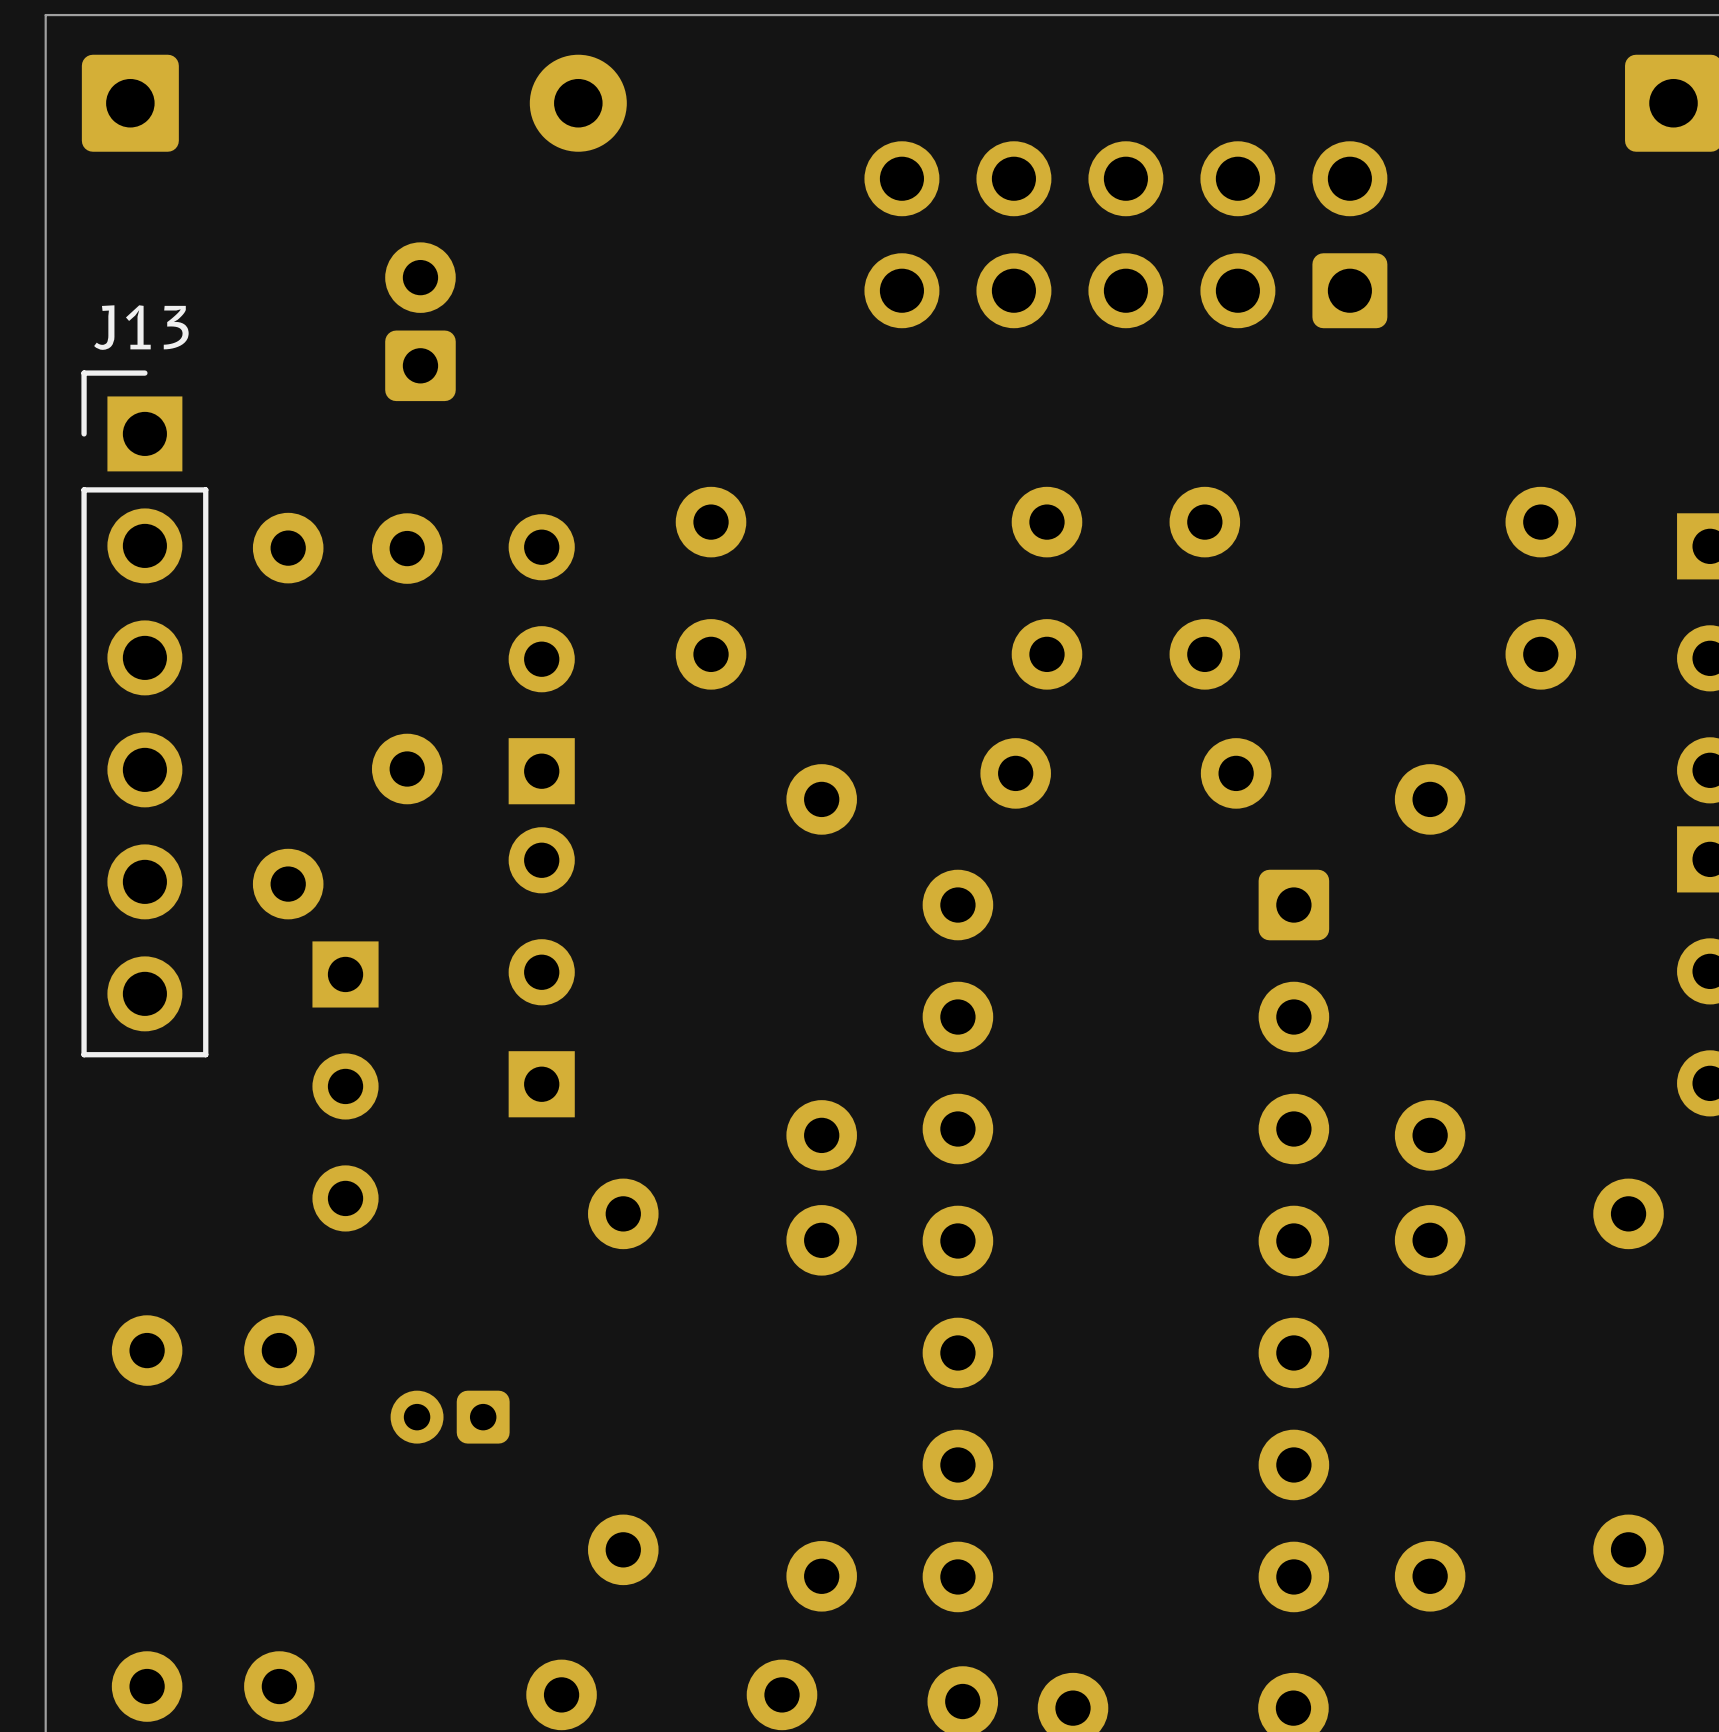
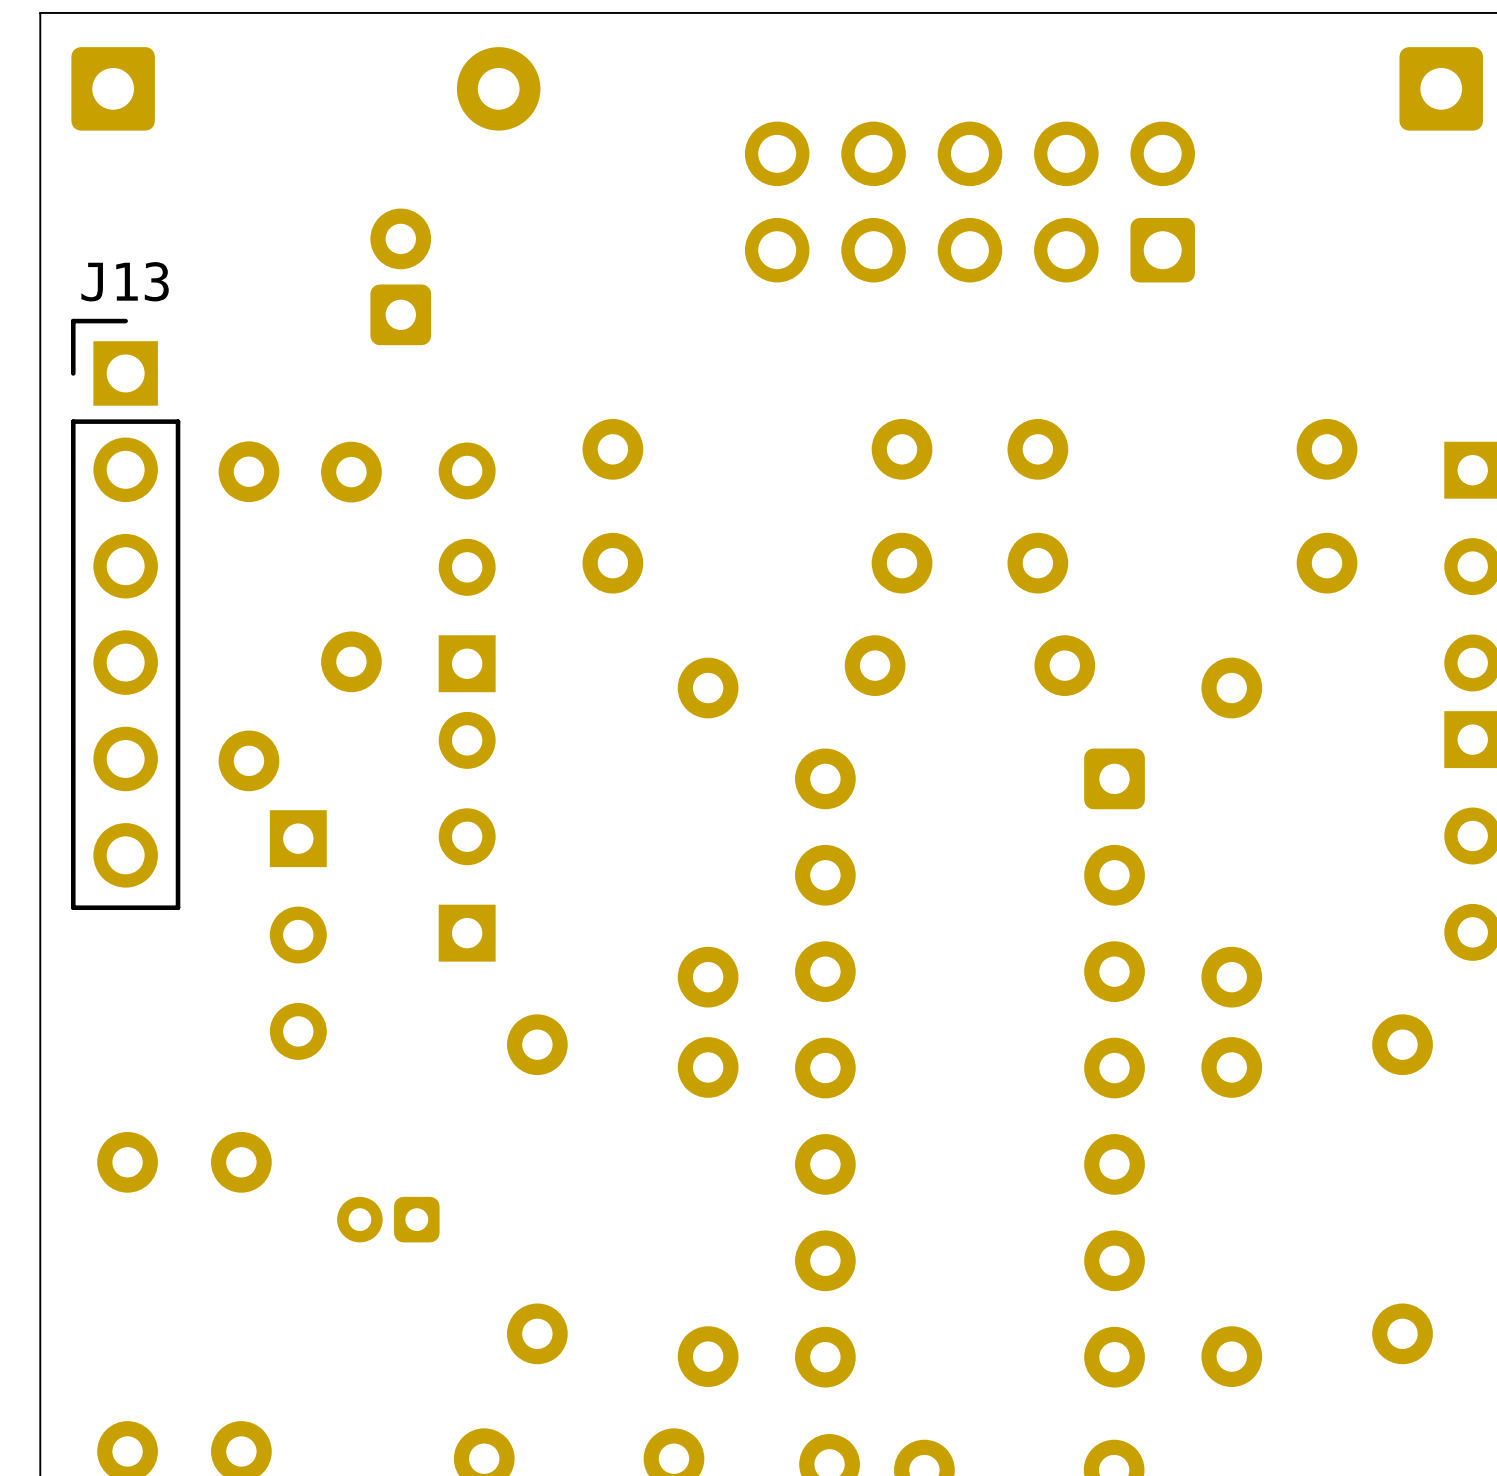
part position: (420, 321) -> (400, 276)

